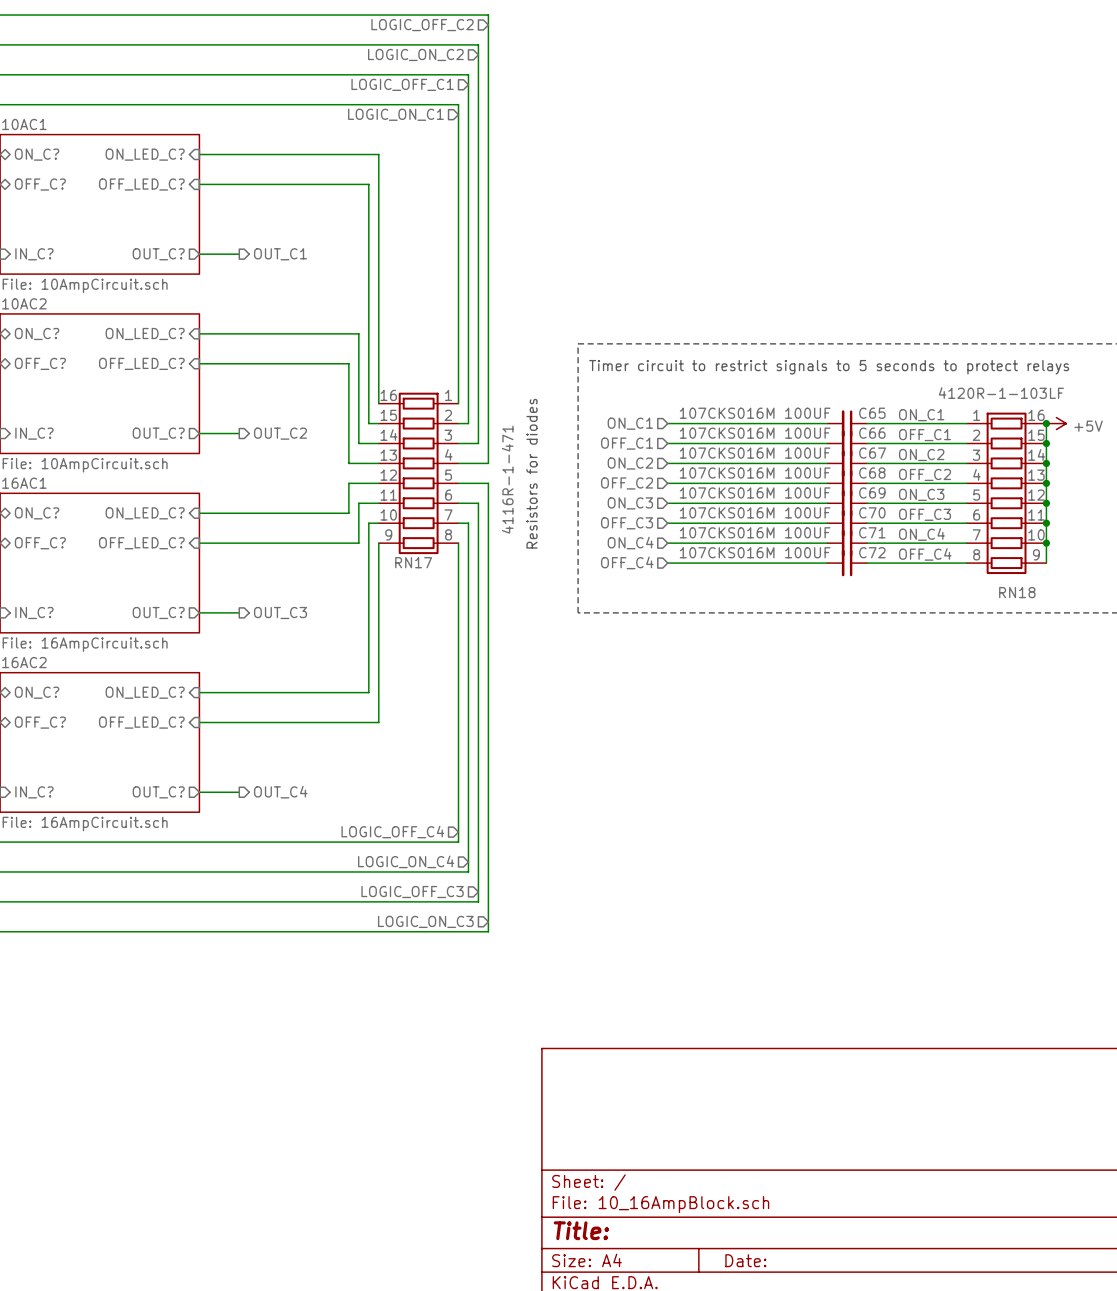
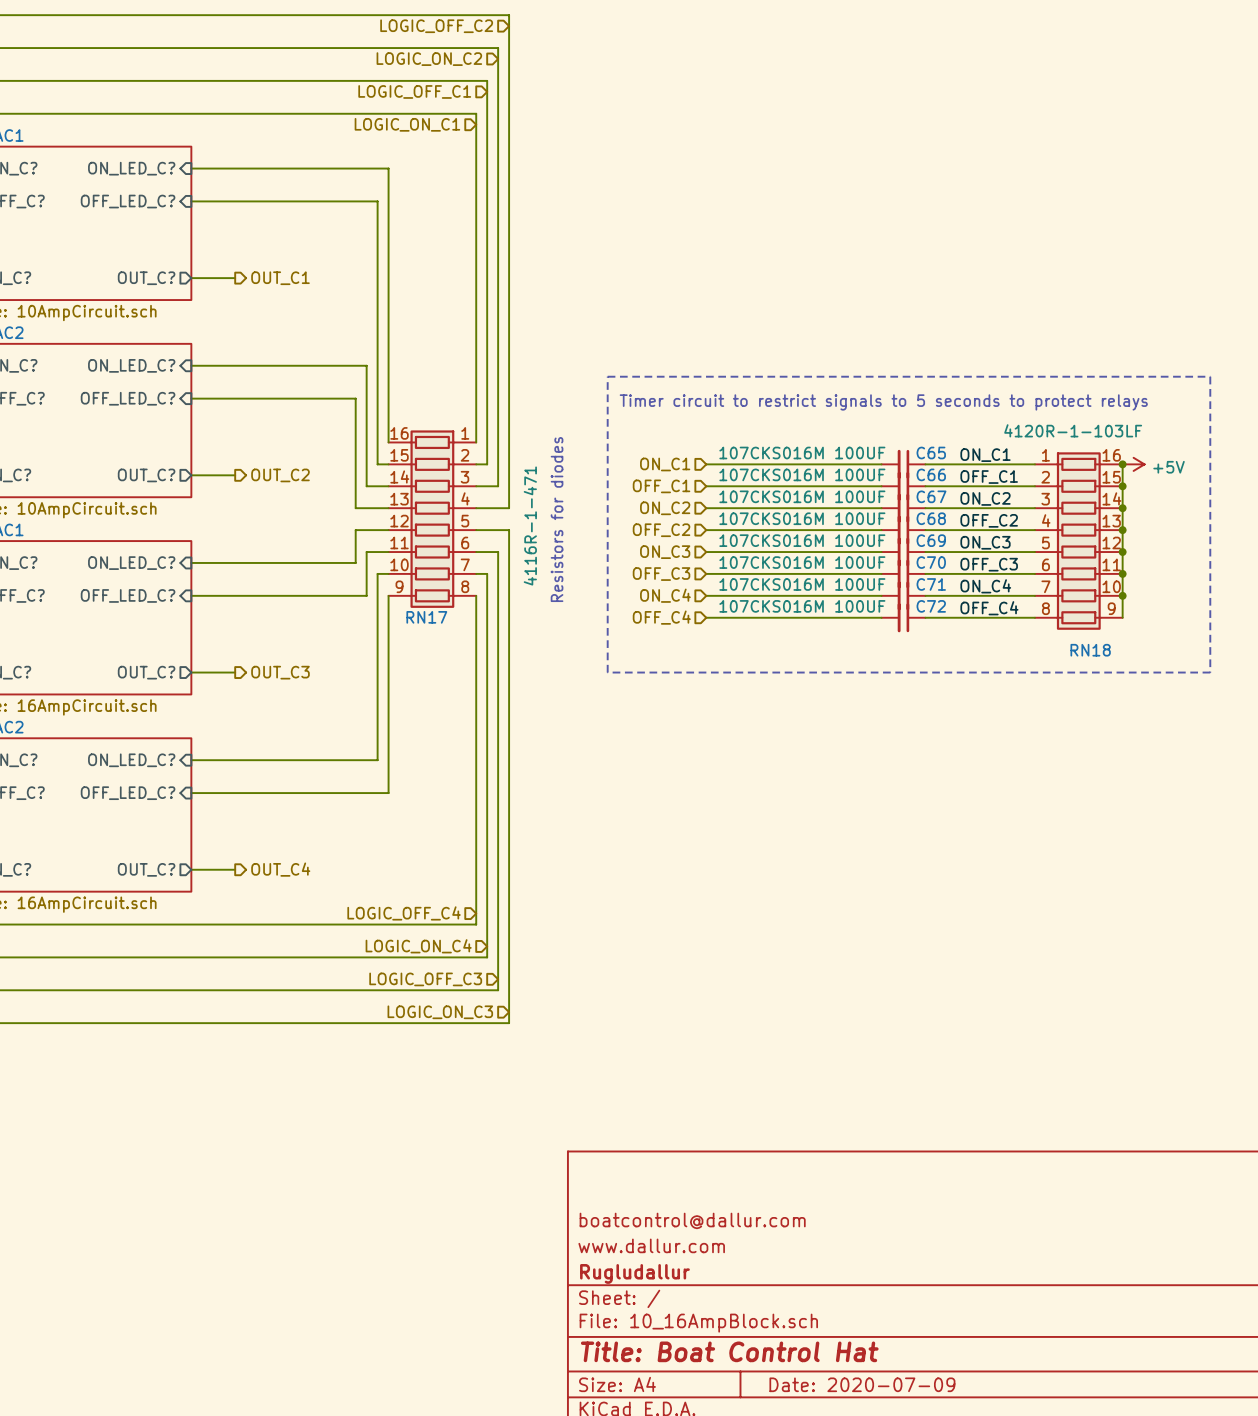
title block: none -> boatcontrol@dallur.com (692, 1220)
title block: none -> www.dallur.com (651, 1245)
title block: none -> Rugludallur (634, 1273)
title block: Title: (581, 1230) -> Title: Boat Control Hat (729, 1351)
title block: Date: (745, 1260) -> Date: 2020-07-09 (862, 1384)

